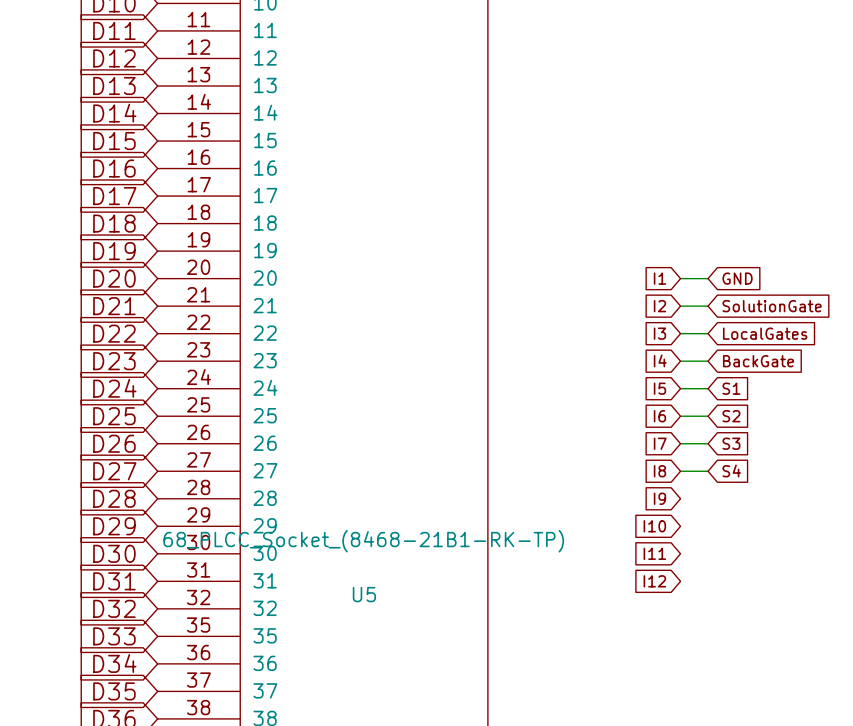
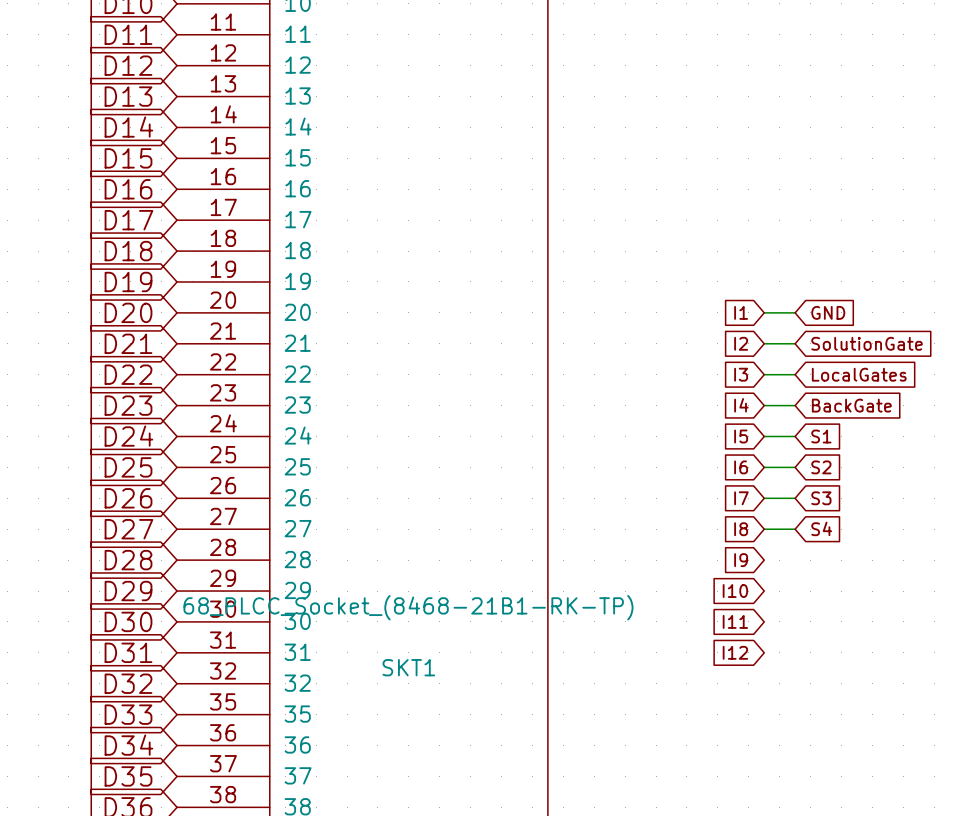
U5 name: U5 (364, 594) -> SKT1 (408, 667)

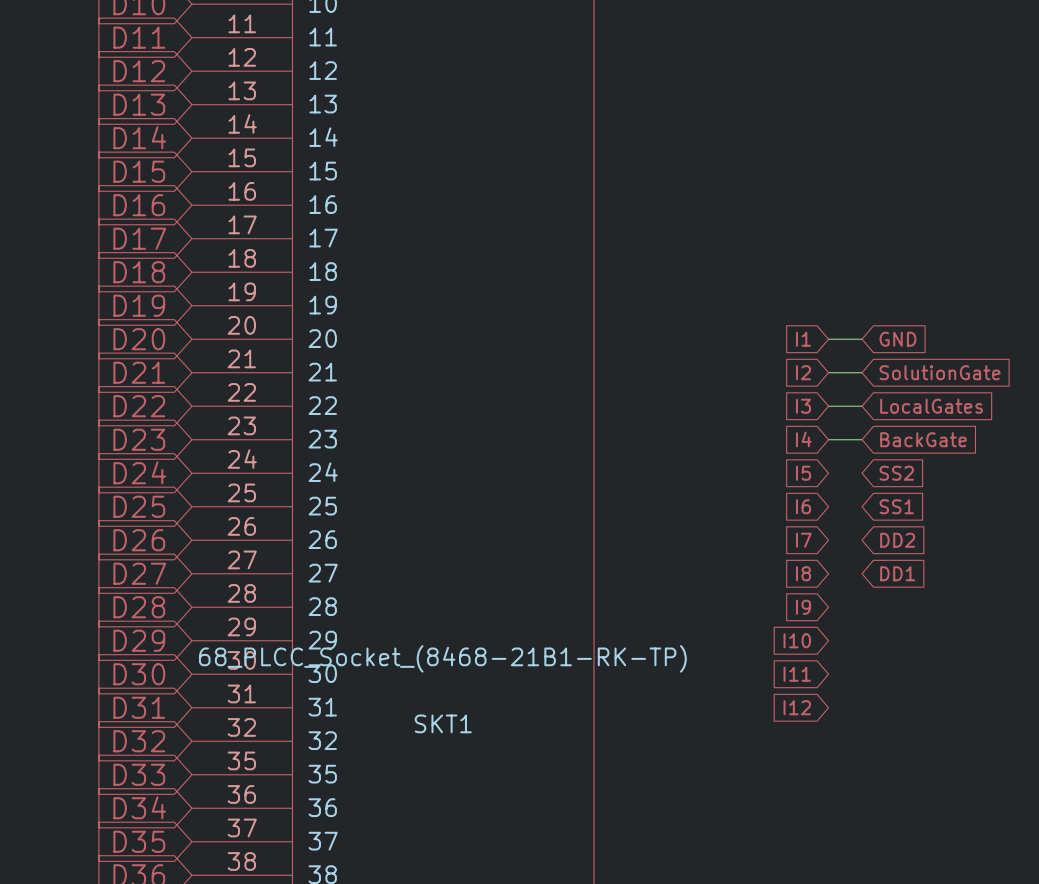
wire: (764, 436) (795, 436) -> none
global label: S1 (821, 436) -> SS2 (896, 473)
wire: (764, 467) (795, 467) -> none
global label: S2 (821, 467) -> SS1 (896, 506)
wire: (764, 498) (795, 498) -> none
global label: S3 (821, 498) -> DD2 (897, 540)
global label: S4 (821, 528) -> DD1 (897, 573)
wire: (764, 529) (795, 529) -> none

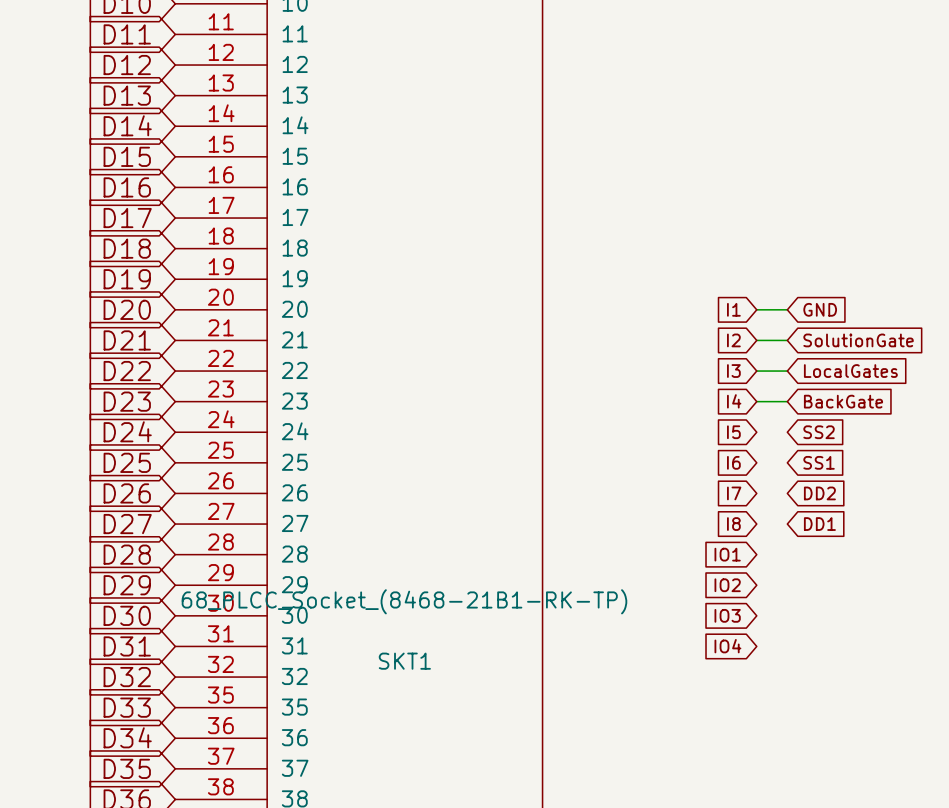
global label: I9 (803, 607) -> IO1 (727, 554)
global label: I10 (797, 640) -> IO2 (727, 585)
global label: I11 (797, 674) -> IO3 (727, 615)
global label: I12 (797, 707) -> IO4 (727, 646)

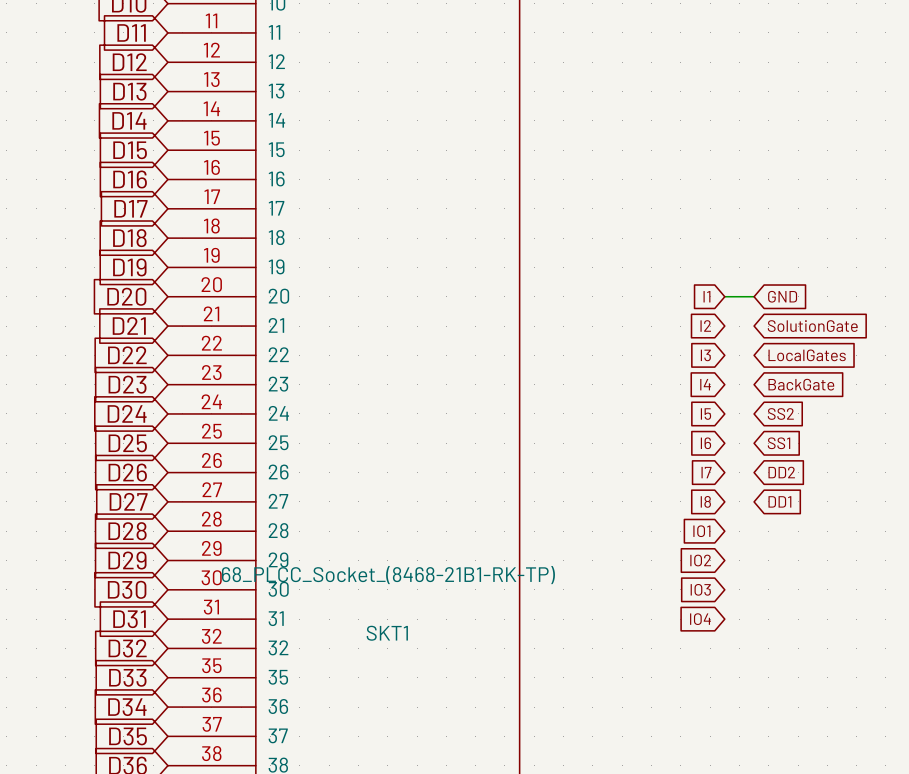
wire: (756, 340) (787, 340) -> none
wire: (756, 371) (787, 371) -> none
wire: (756, 401) (787, 401) -> none

